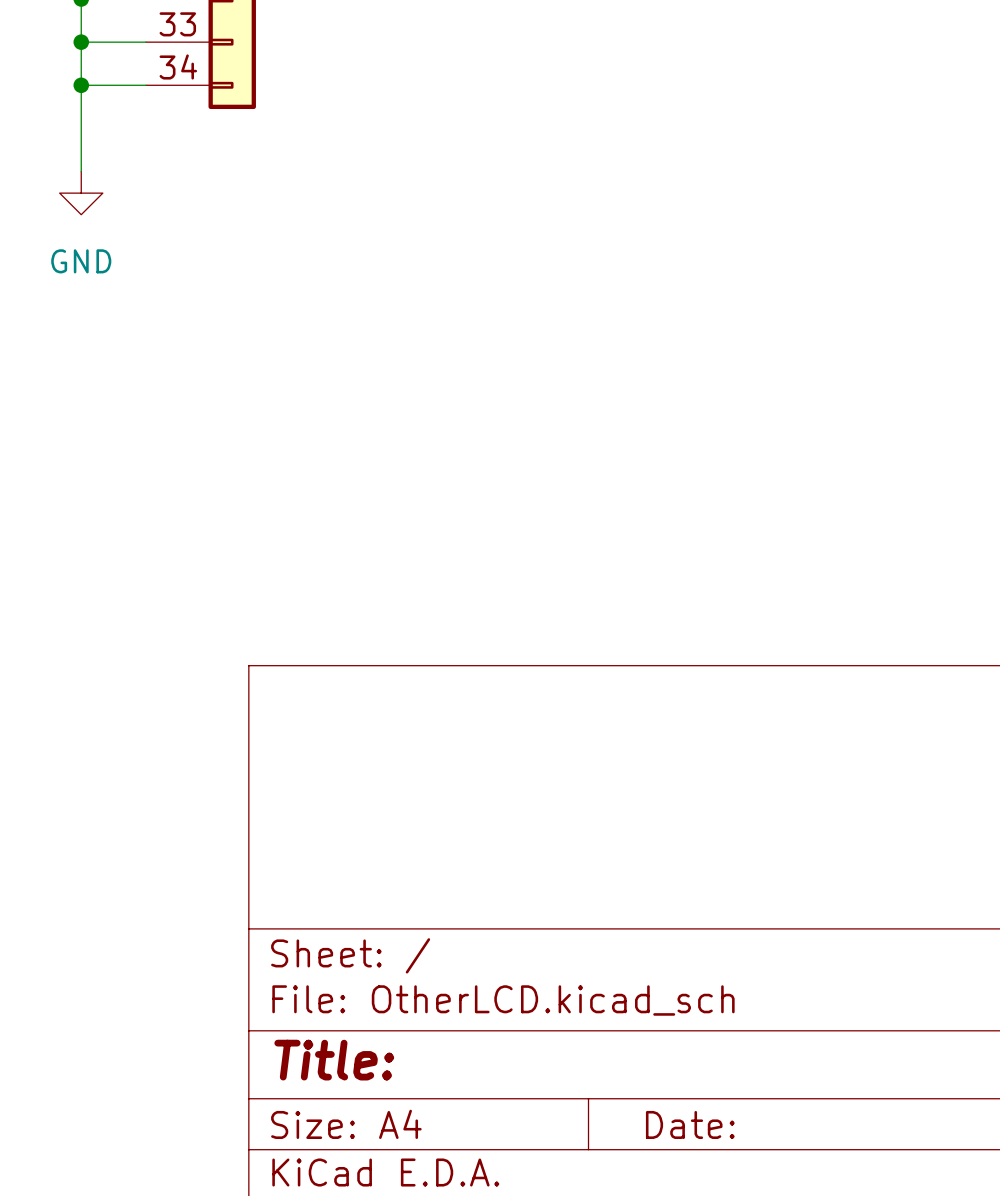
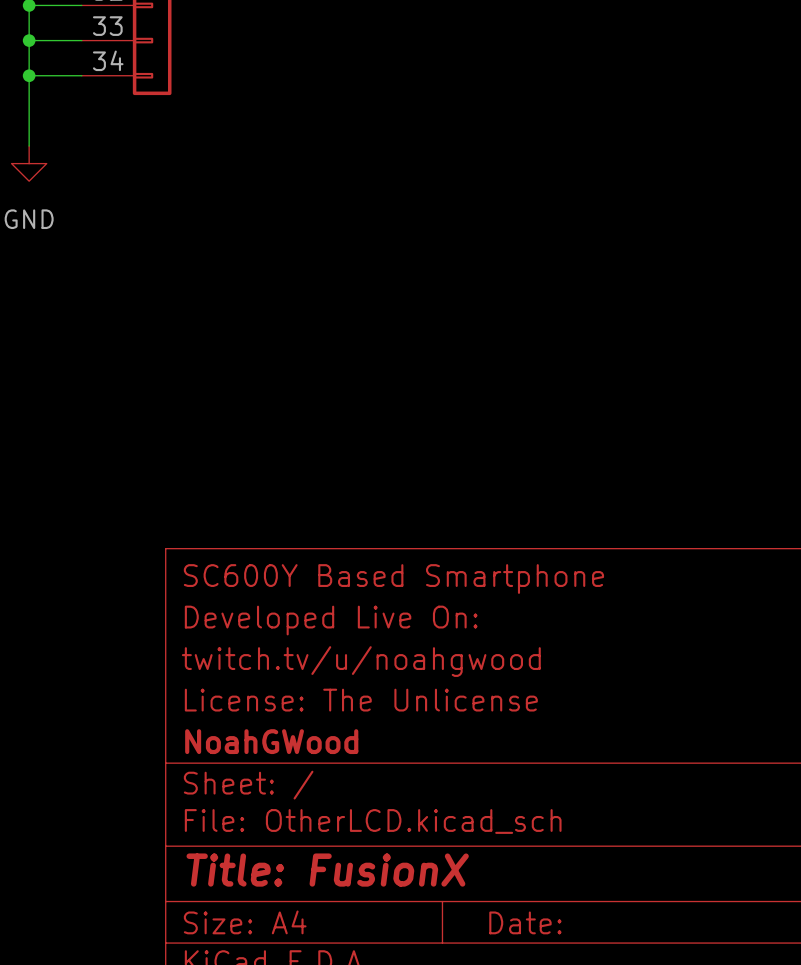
title block: none -> SC600Y Based Smartphone (393, 579)
title block: none -> Developed Live On: (331, 620)
title block: none -> twitch.tv/u/noahgwood (361, 661)
title block: none -> License: The Unlicense (361, 700)
title block: none -> NoahGWood (271, 741)
title block: Title: (334, 1060) -> Title: FusionX (327, 870)

